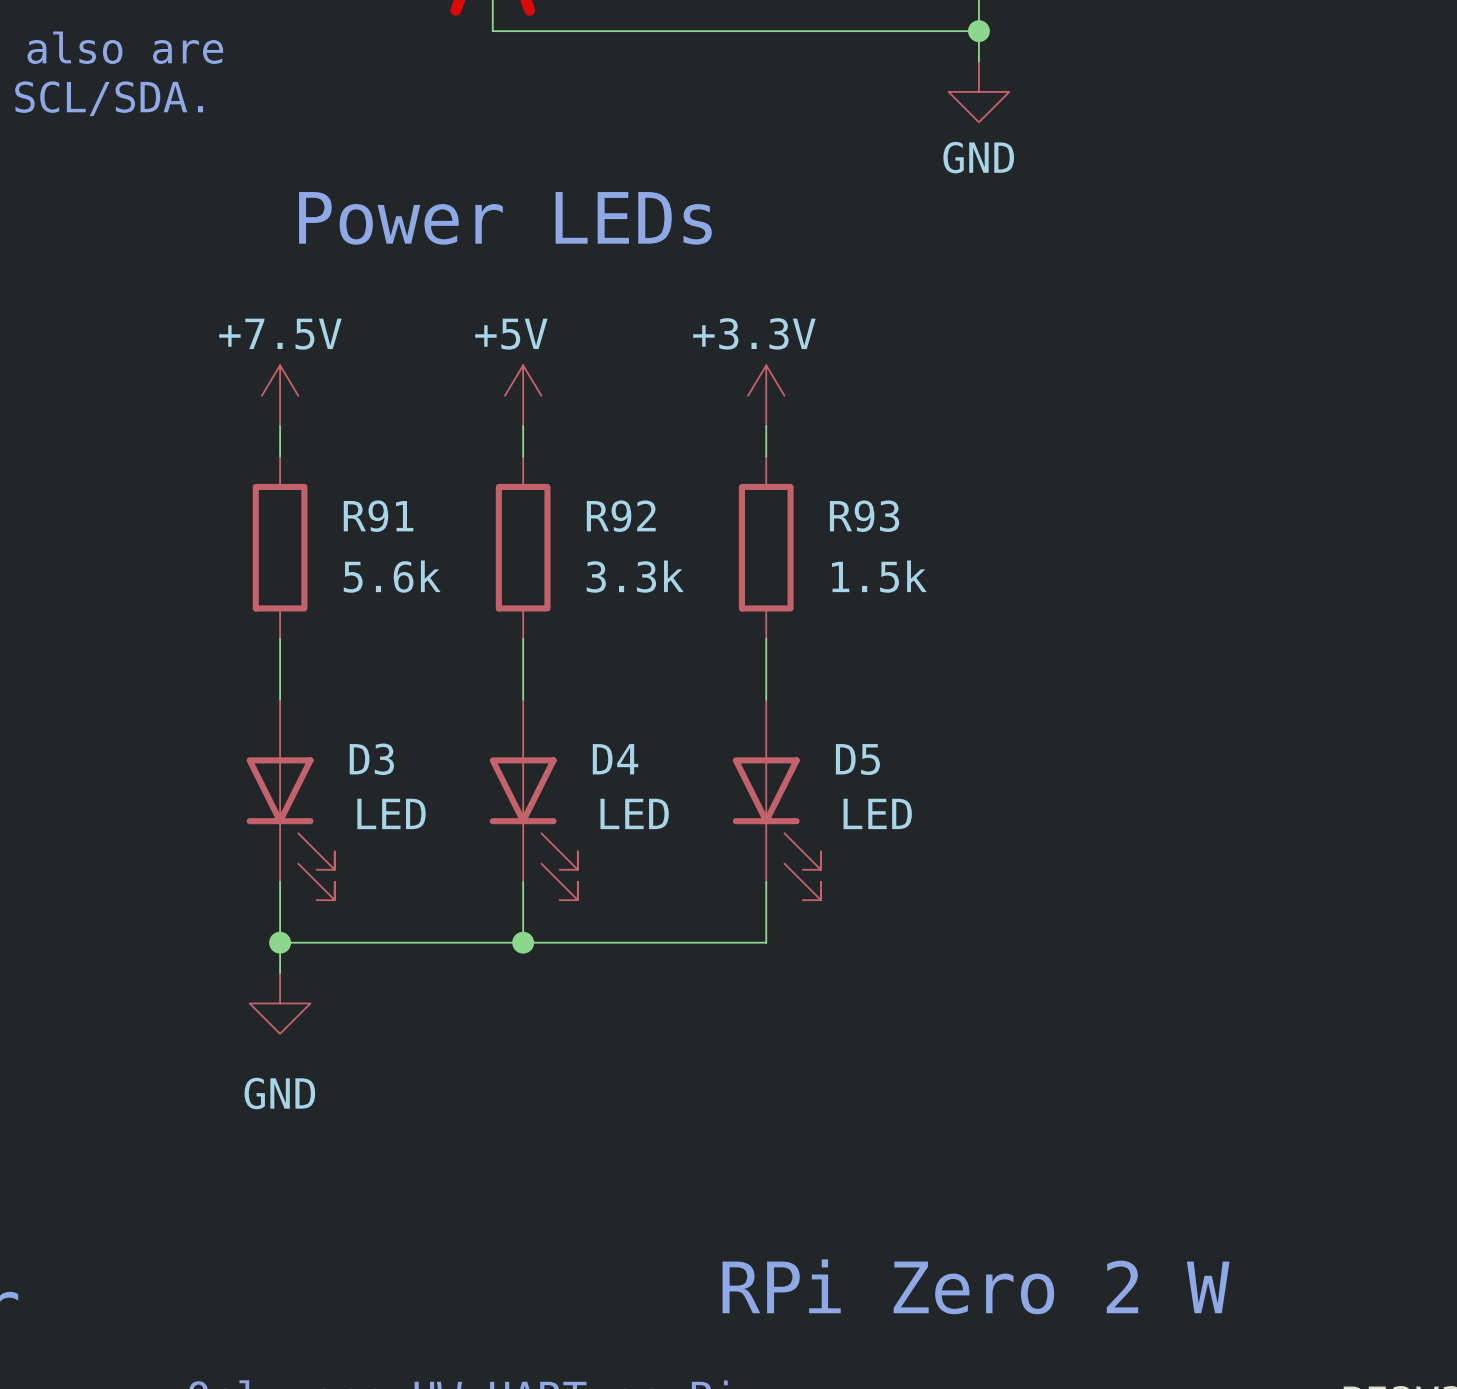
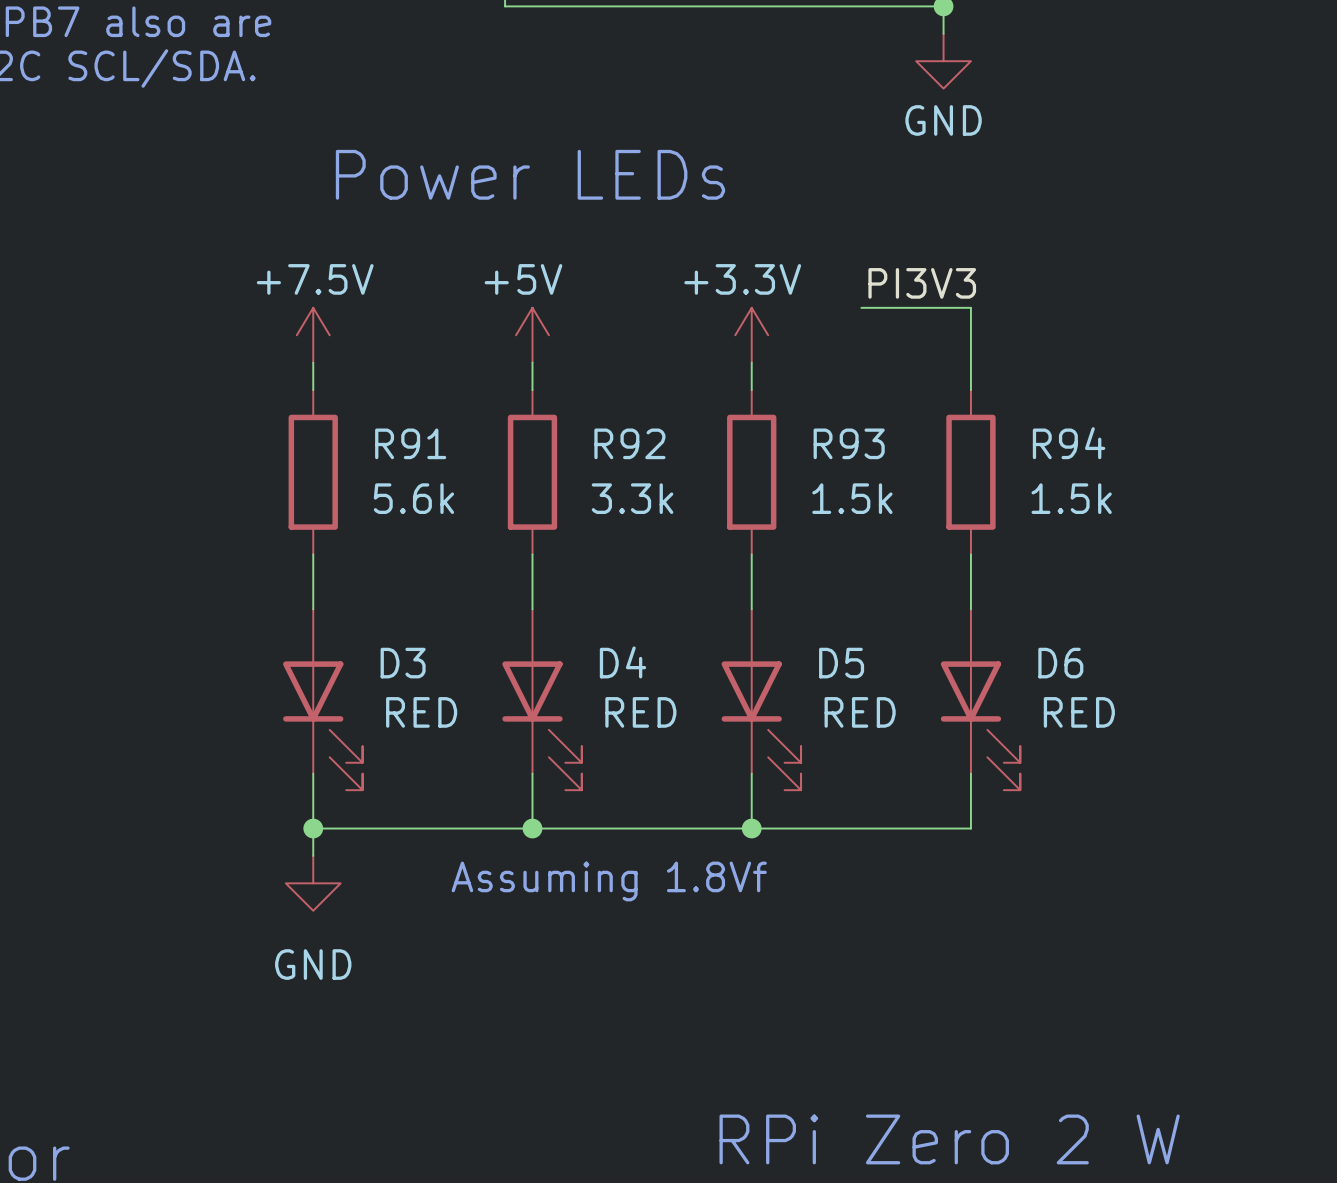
label: none -> PI3V3 (922, 283)
wire: none -> (861, 307) (970, 307) (970, 390)
R94: none -> 1.5k (970, 472)
wire: none -> (970, 554) (970, 609)
D6: none -> RED (980, 699)
D3 value: LED (391, 813) -> RED (421, 712)
D4 value: LED (634, 813) -> RED (640, 712)
D5 value: LED (877, 813) -> RED (860, 712)
wire: none -> (970, 773) (970, 828) (751, 828)
junction: none -> (751, 828)
text: none -> Assuming 1.8Vf (609, 881)

